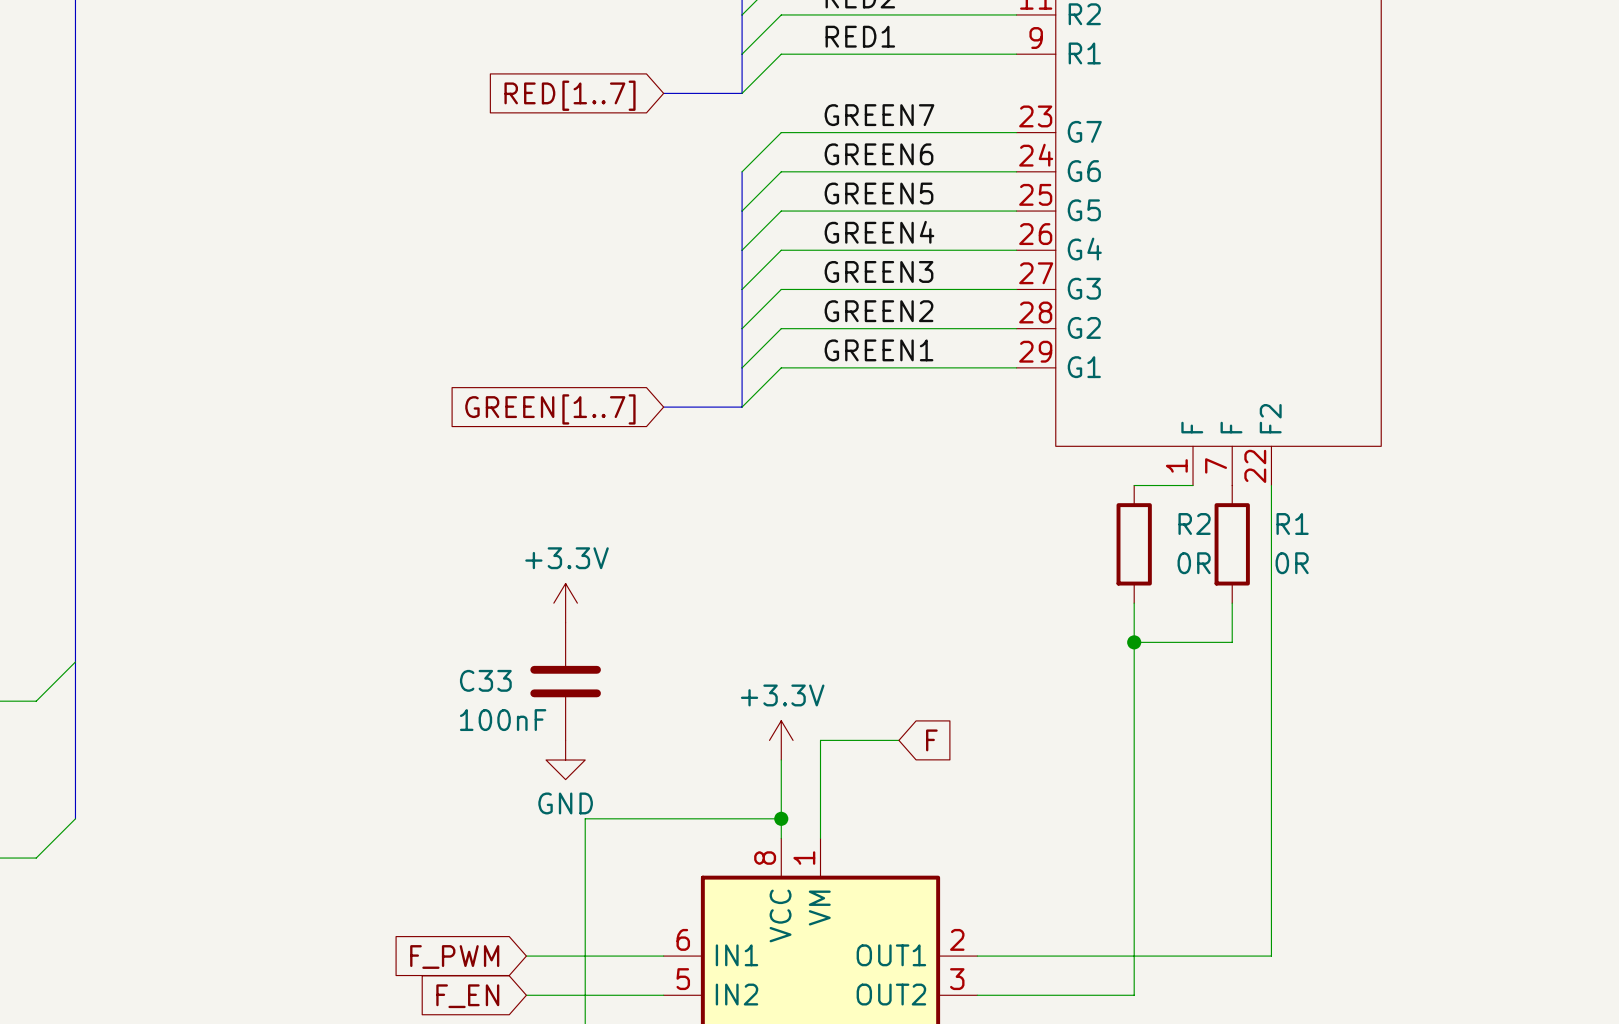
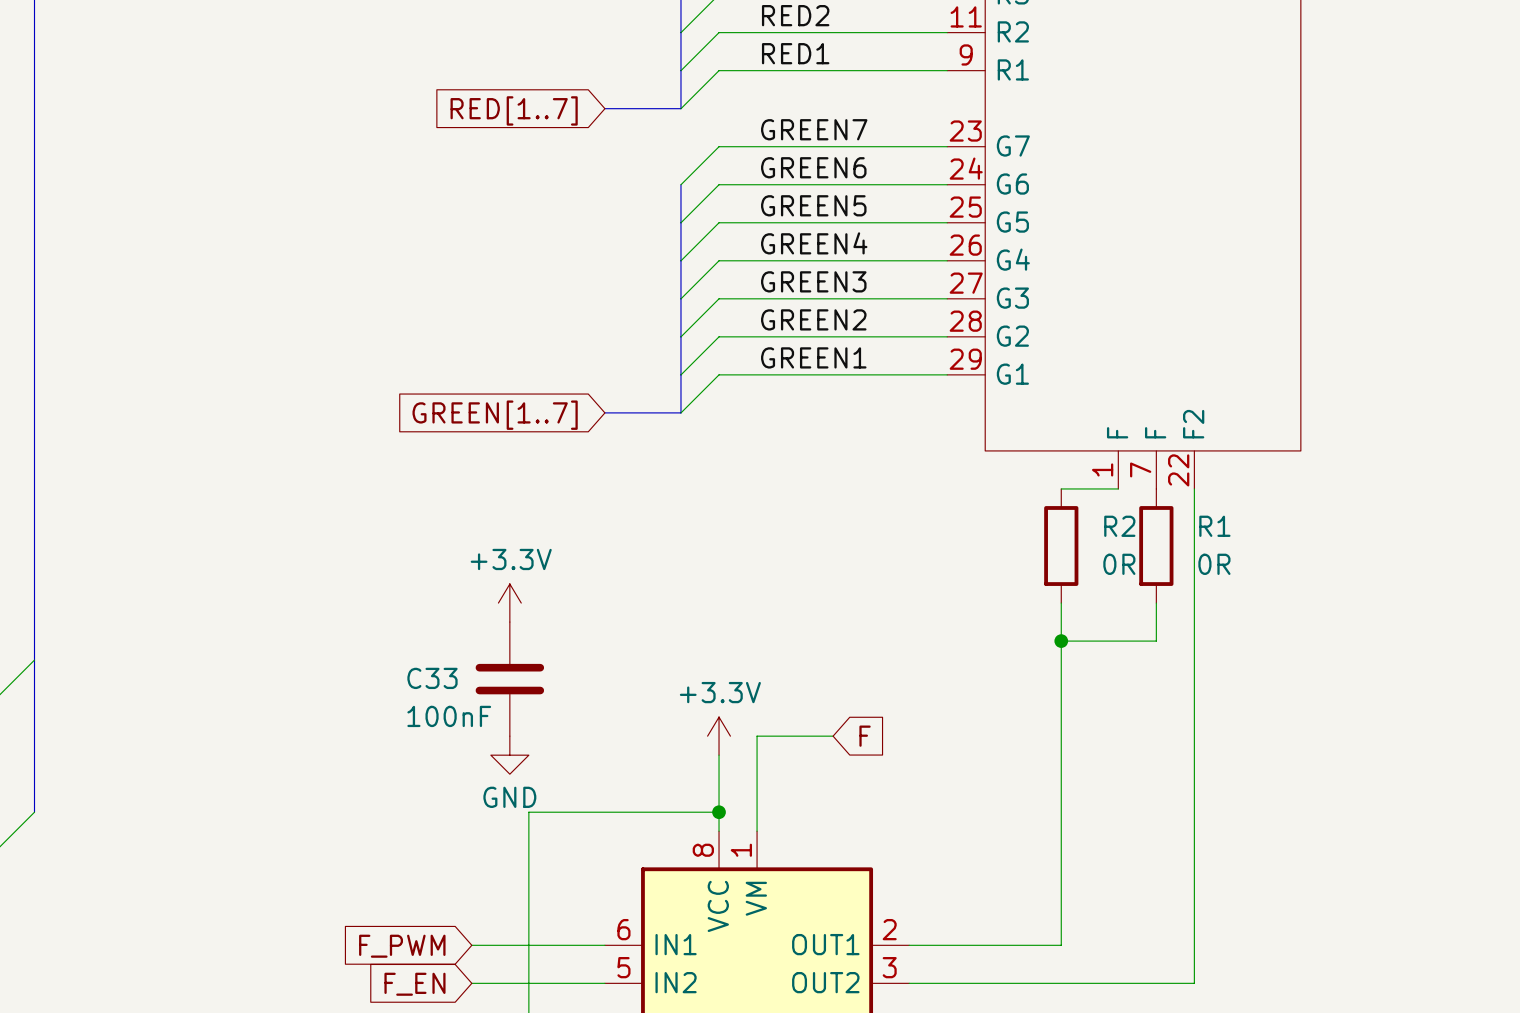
wire: (1271, 956) (1134, 956) (1134, 995) -> (1194, 945) (1194, 983) (1061, 983)

